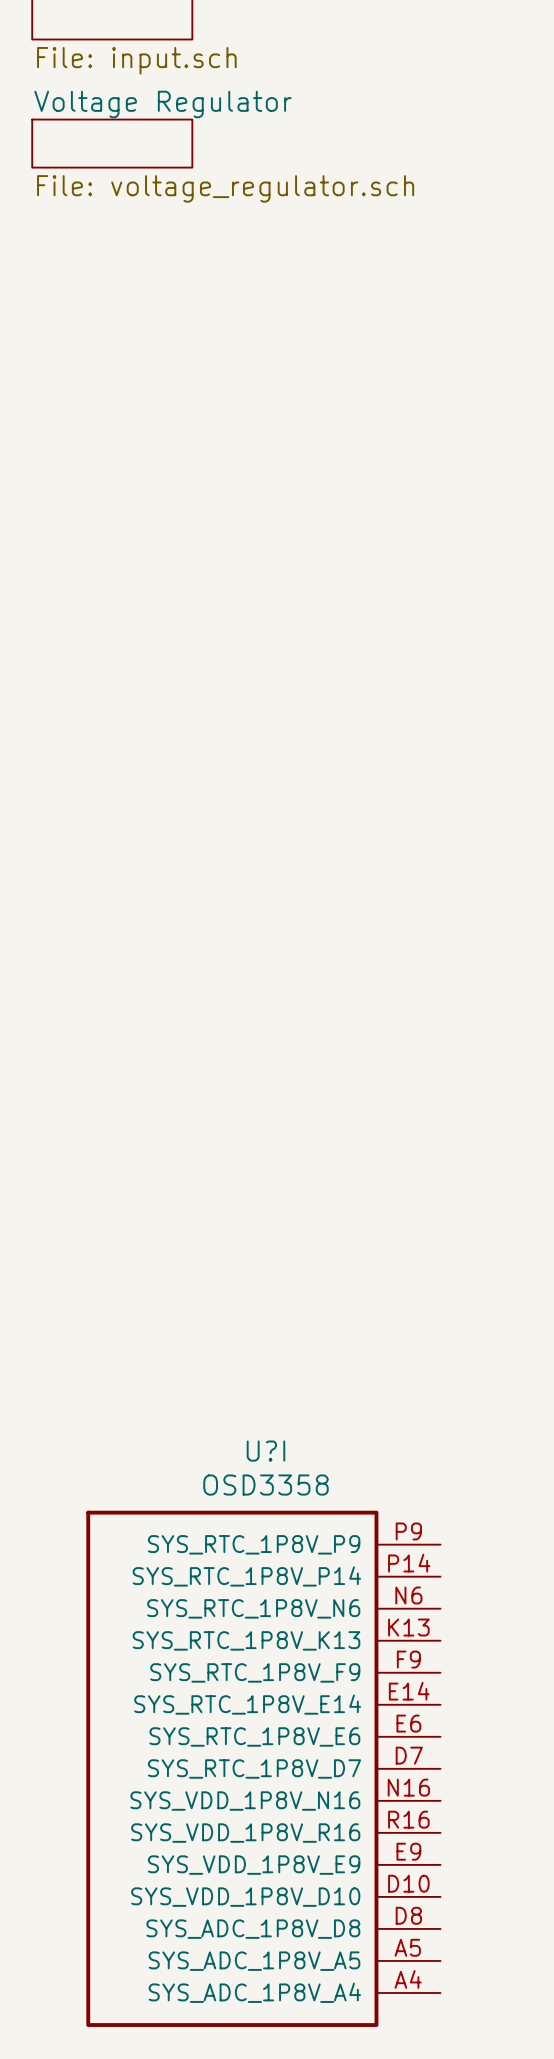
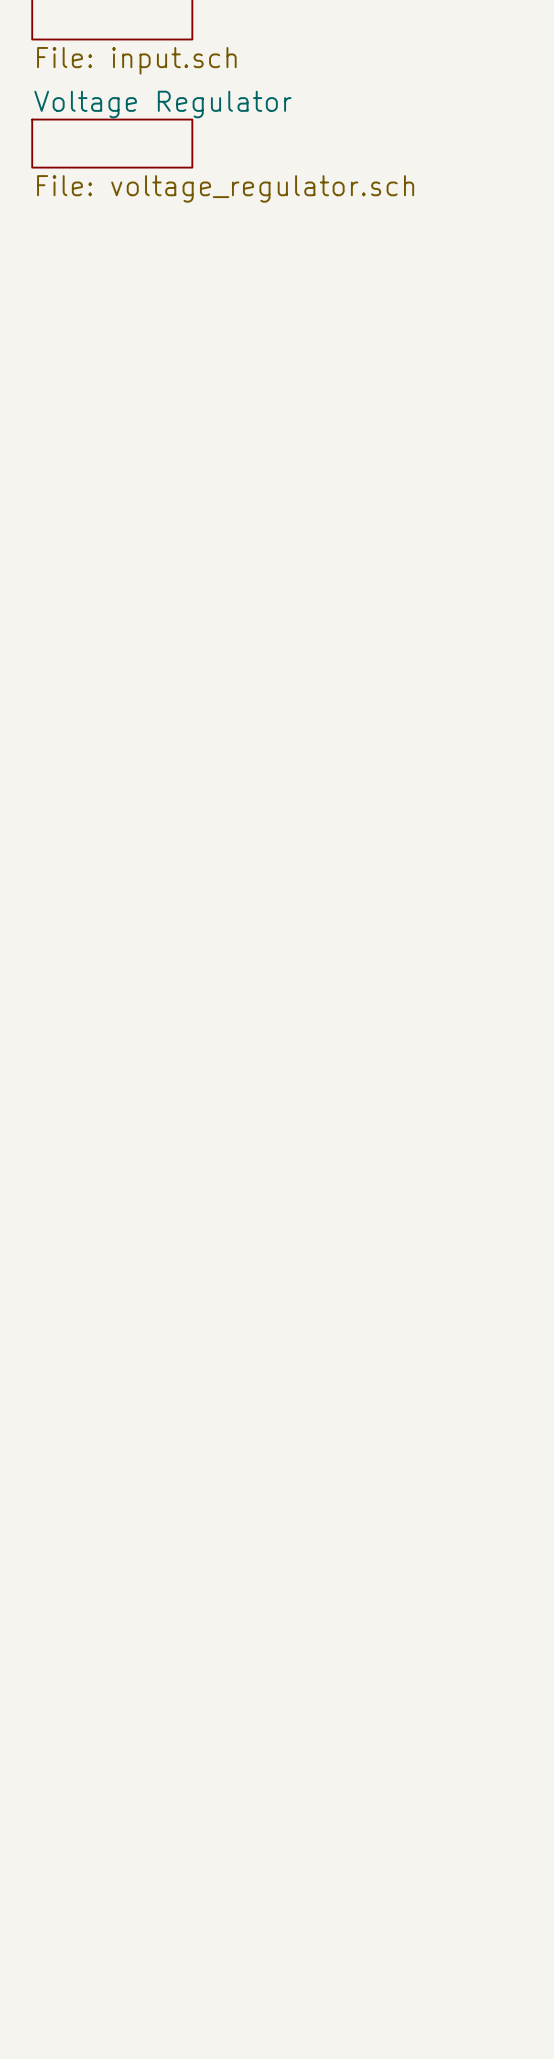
U?I: OSD3358 (263, 1768) -> none

